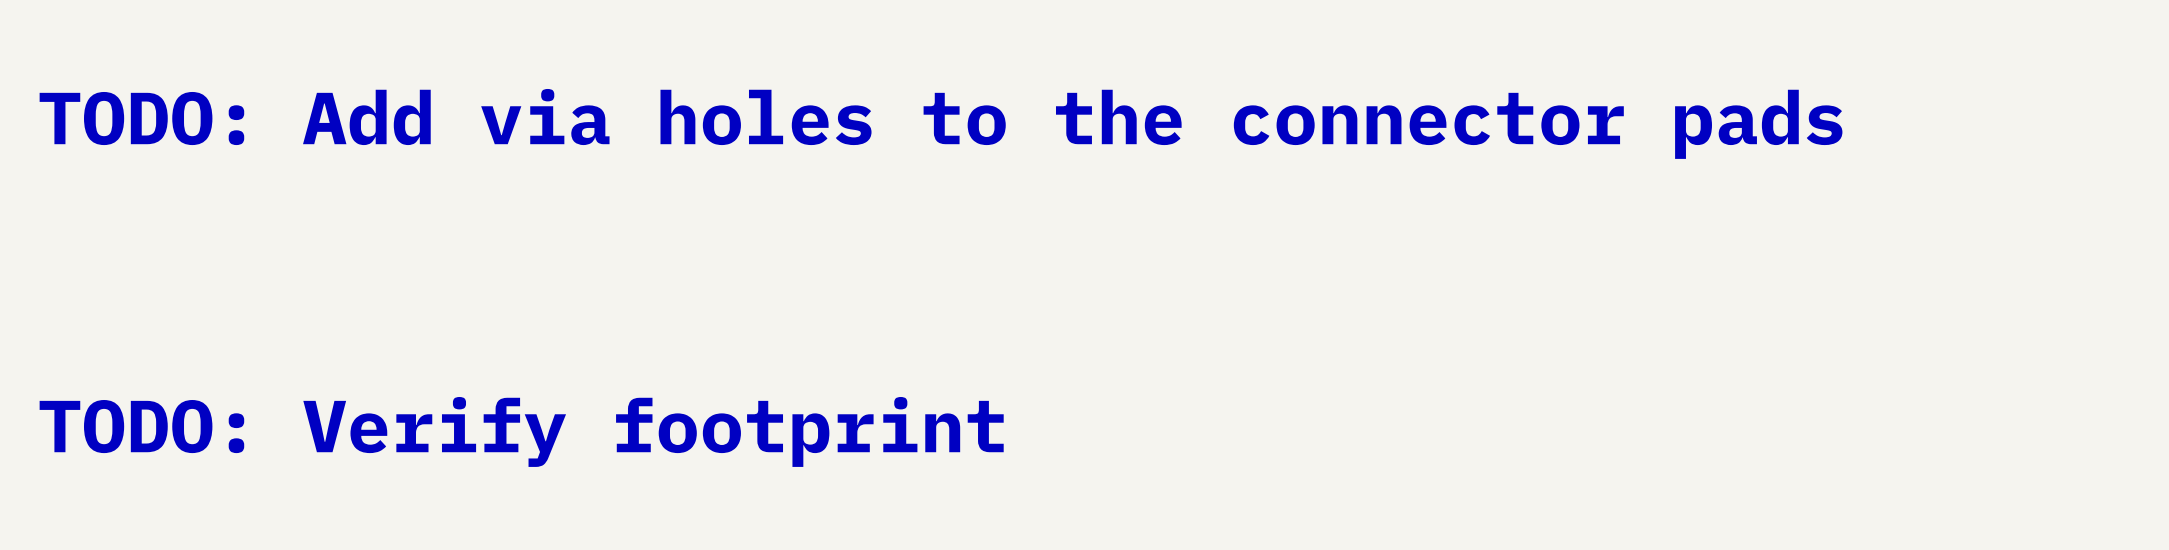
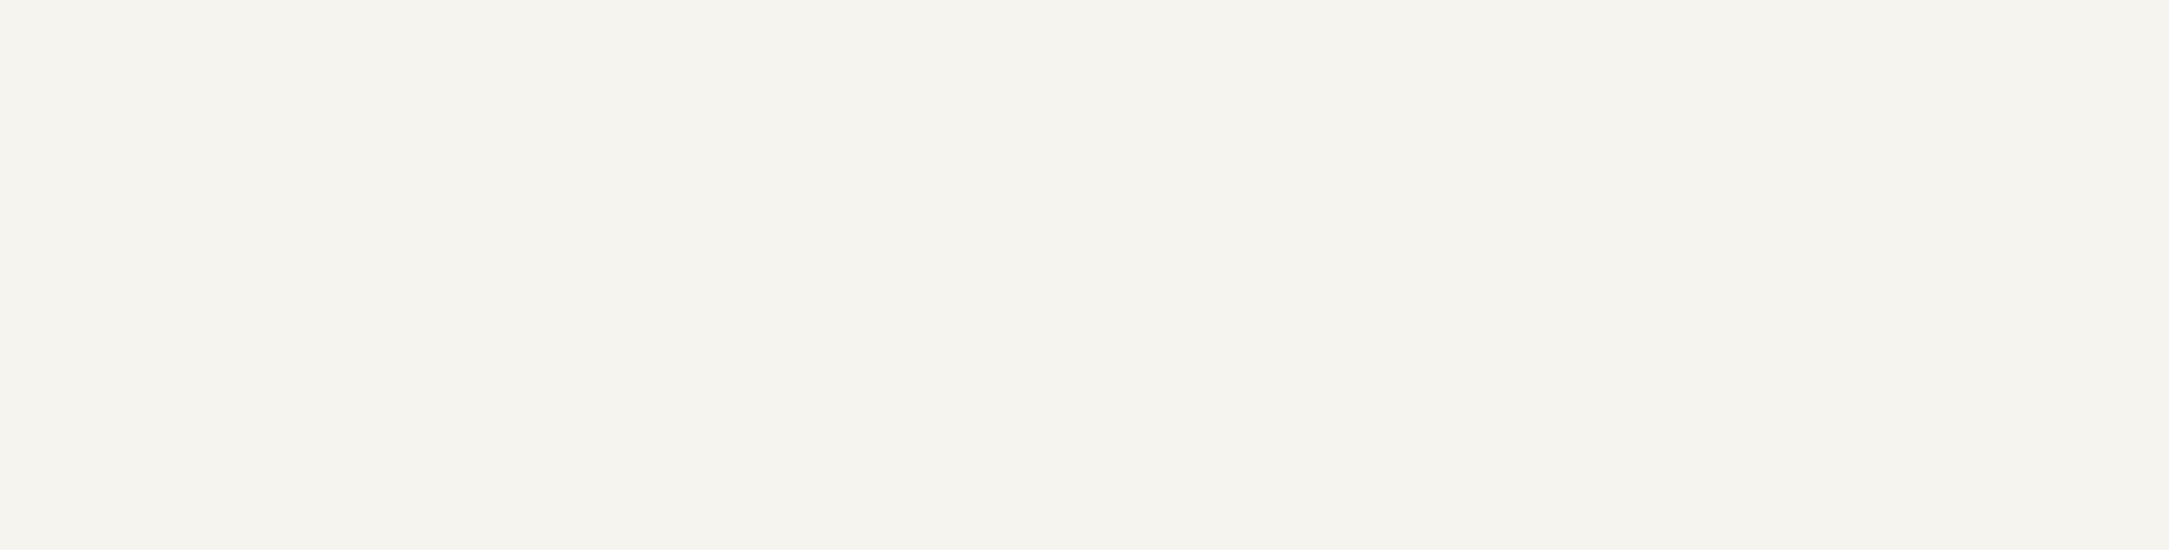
text: TODO: Add via holes to the connector pads (941, 123) -> none
text: TODO: Verify footprint (521, 431) -> none

